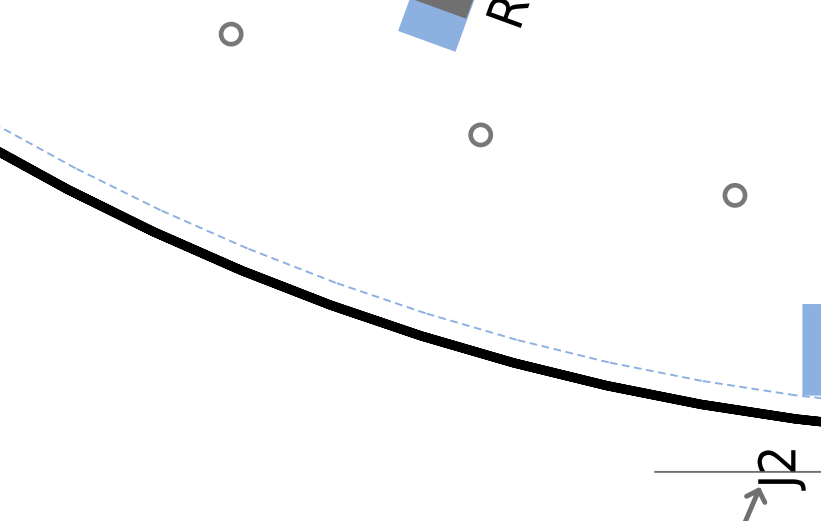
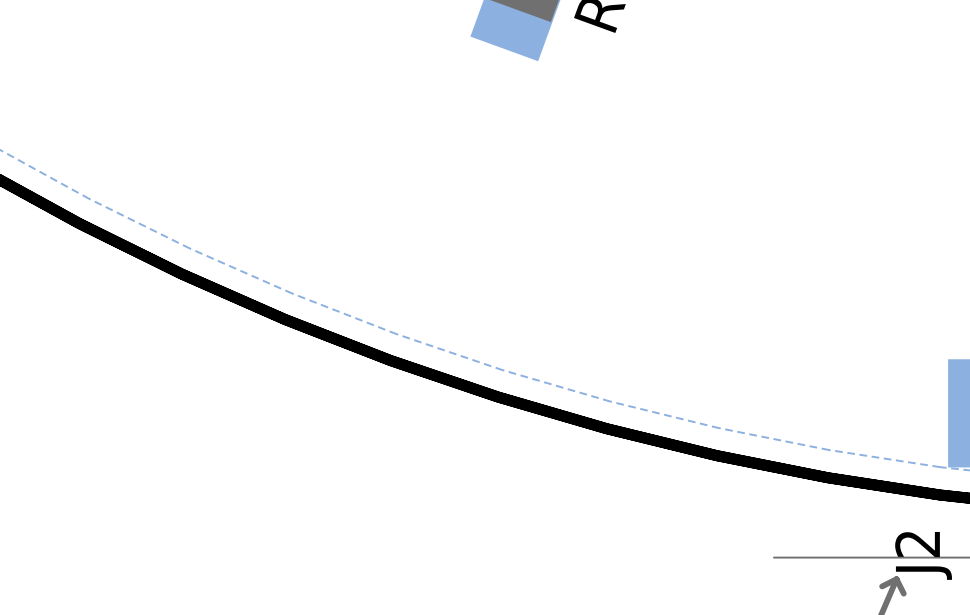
via: (231, 34) -> none
via: (480, 134) -> none
via: (734, 195) -> none

